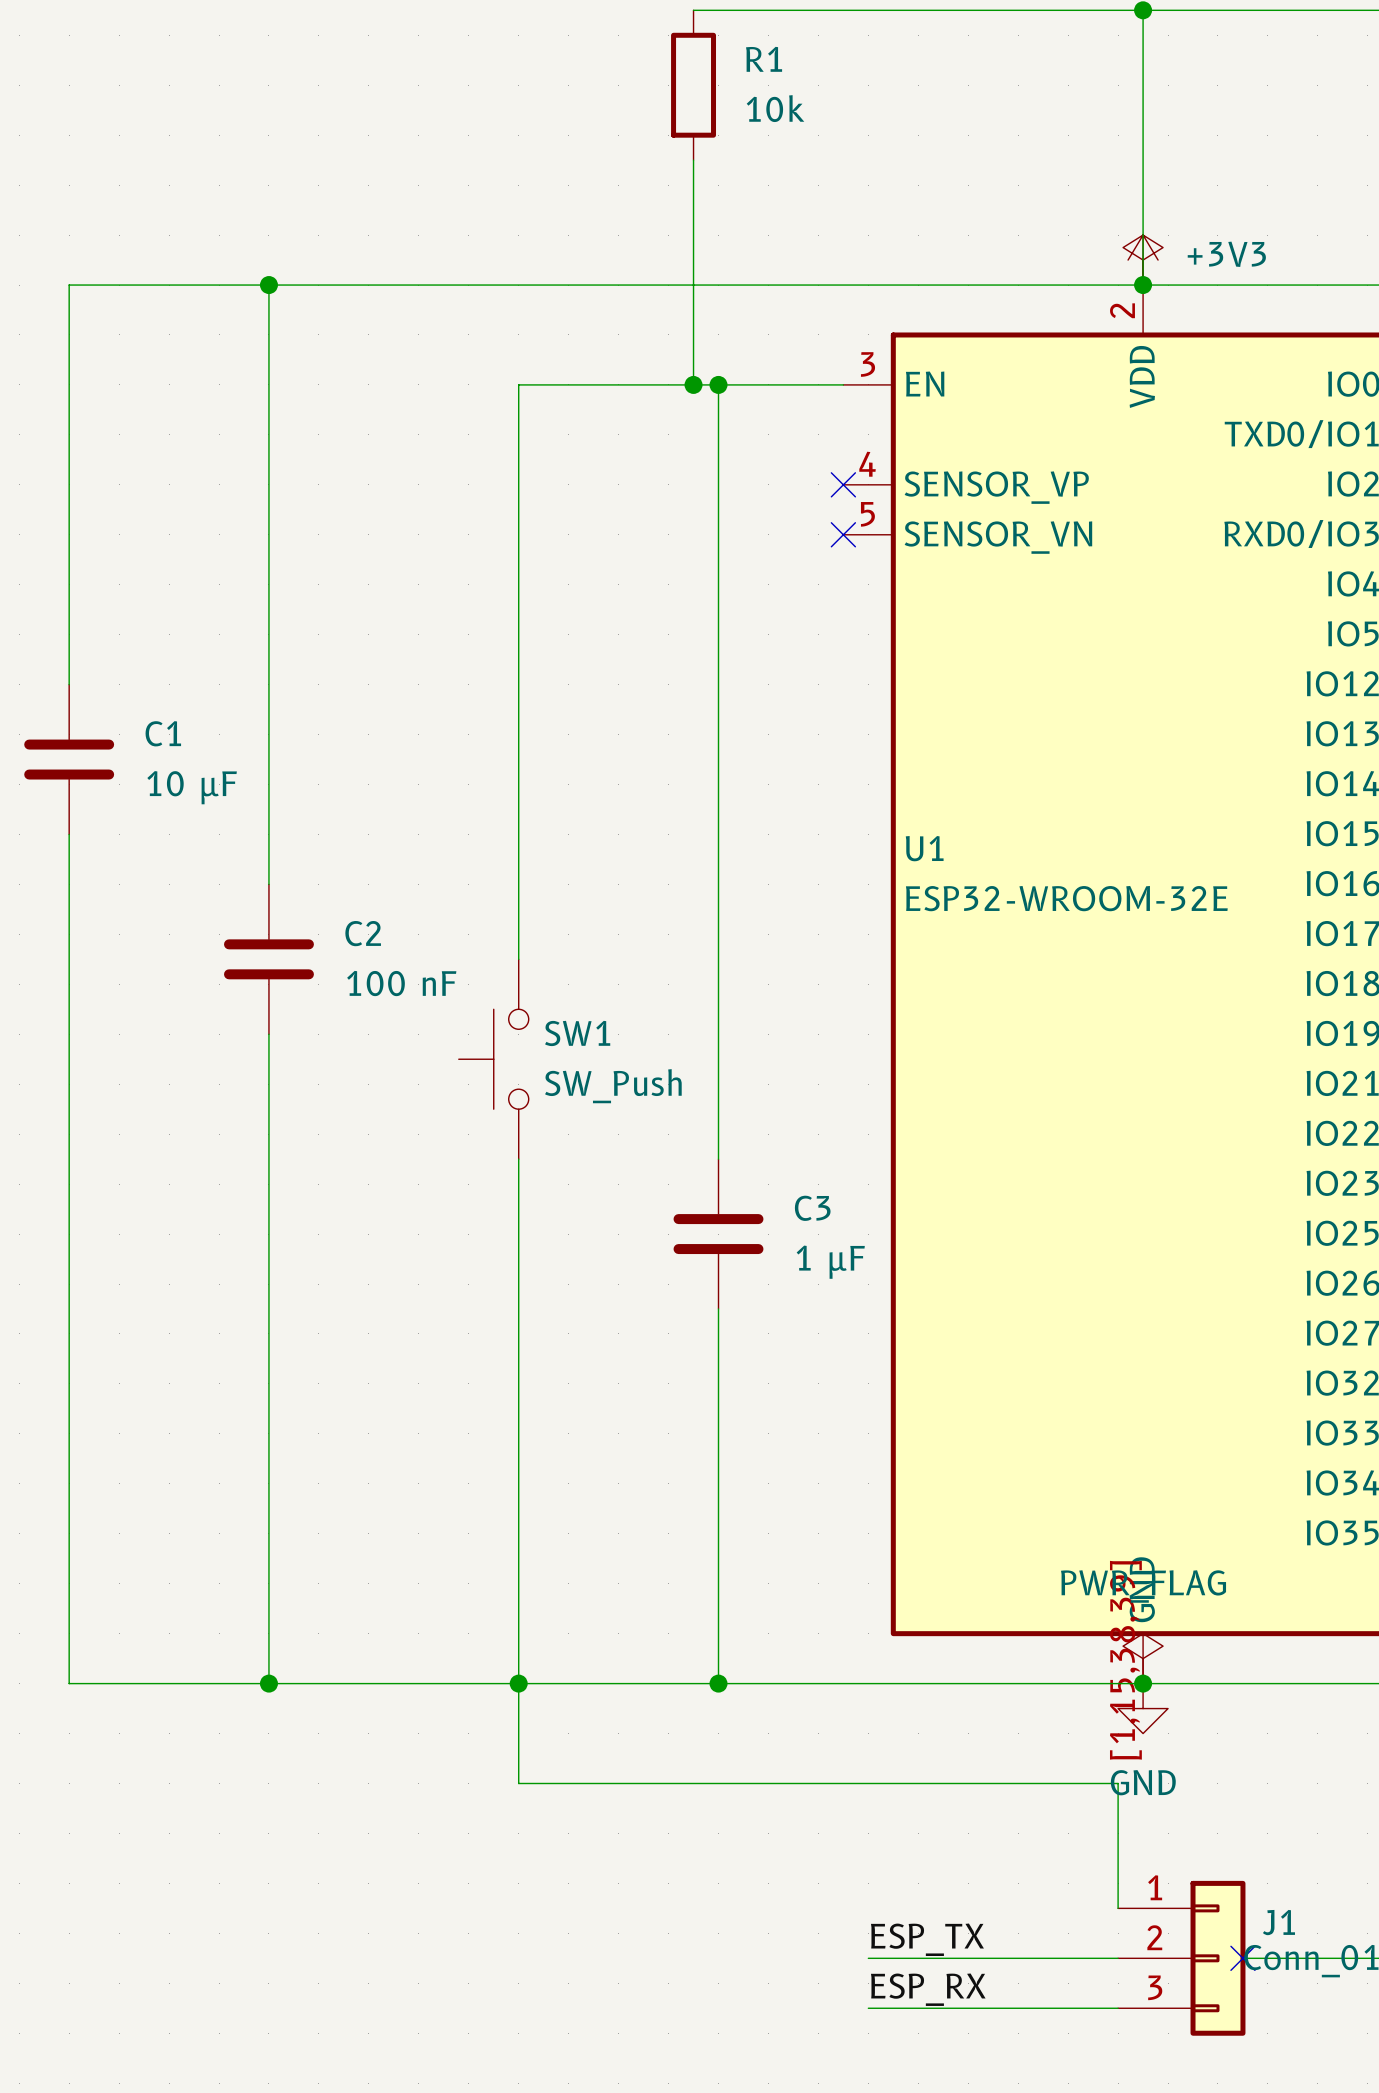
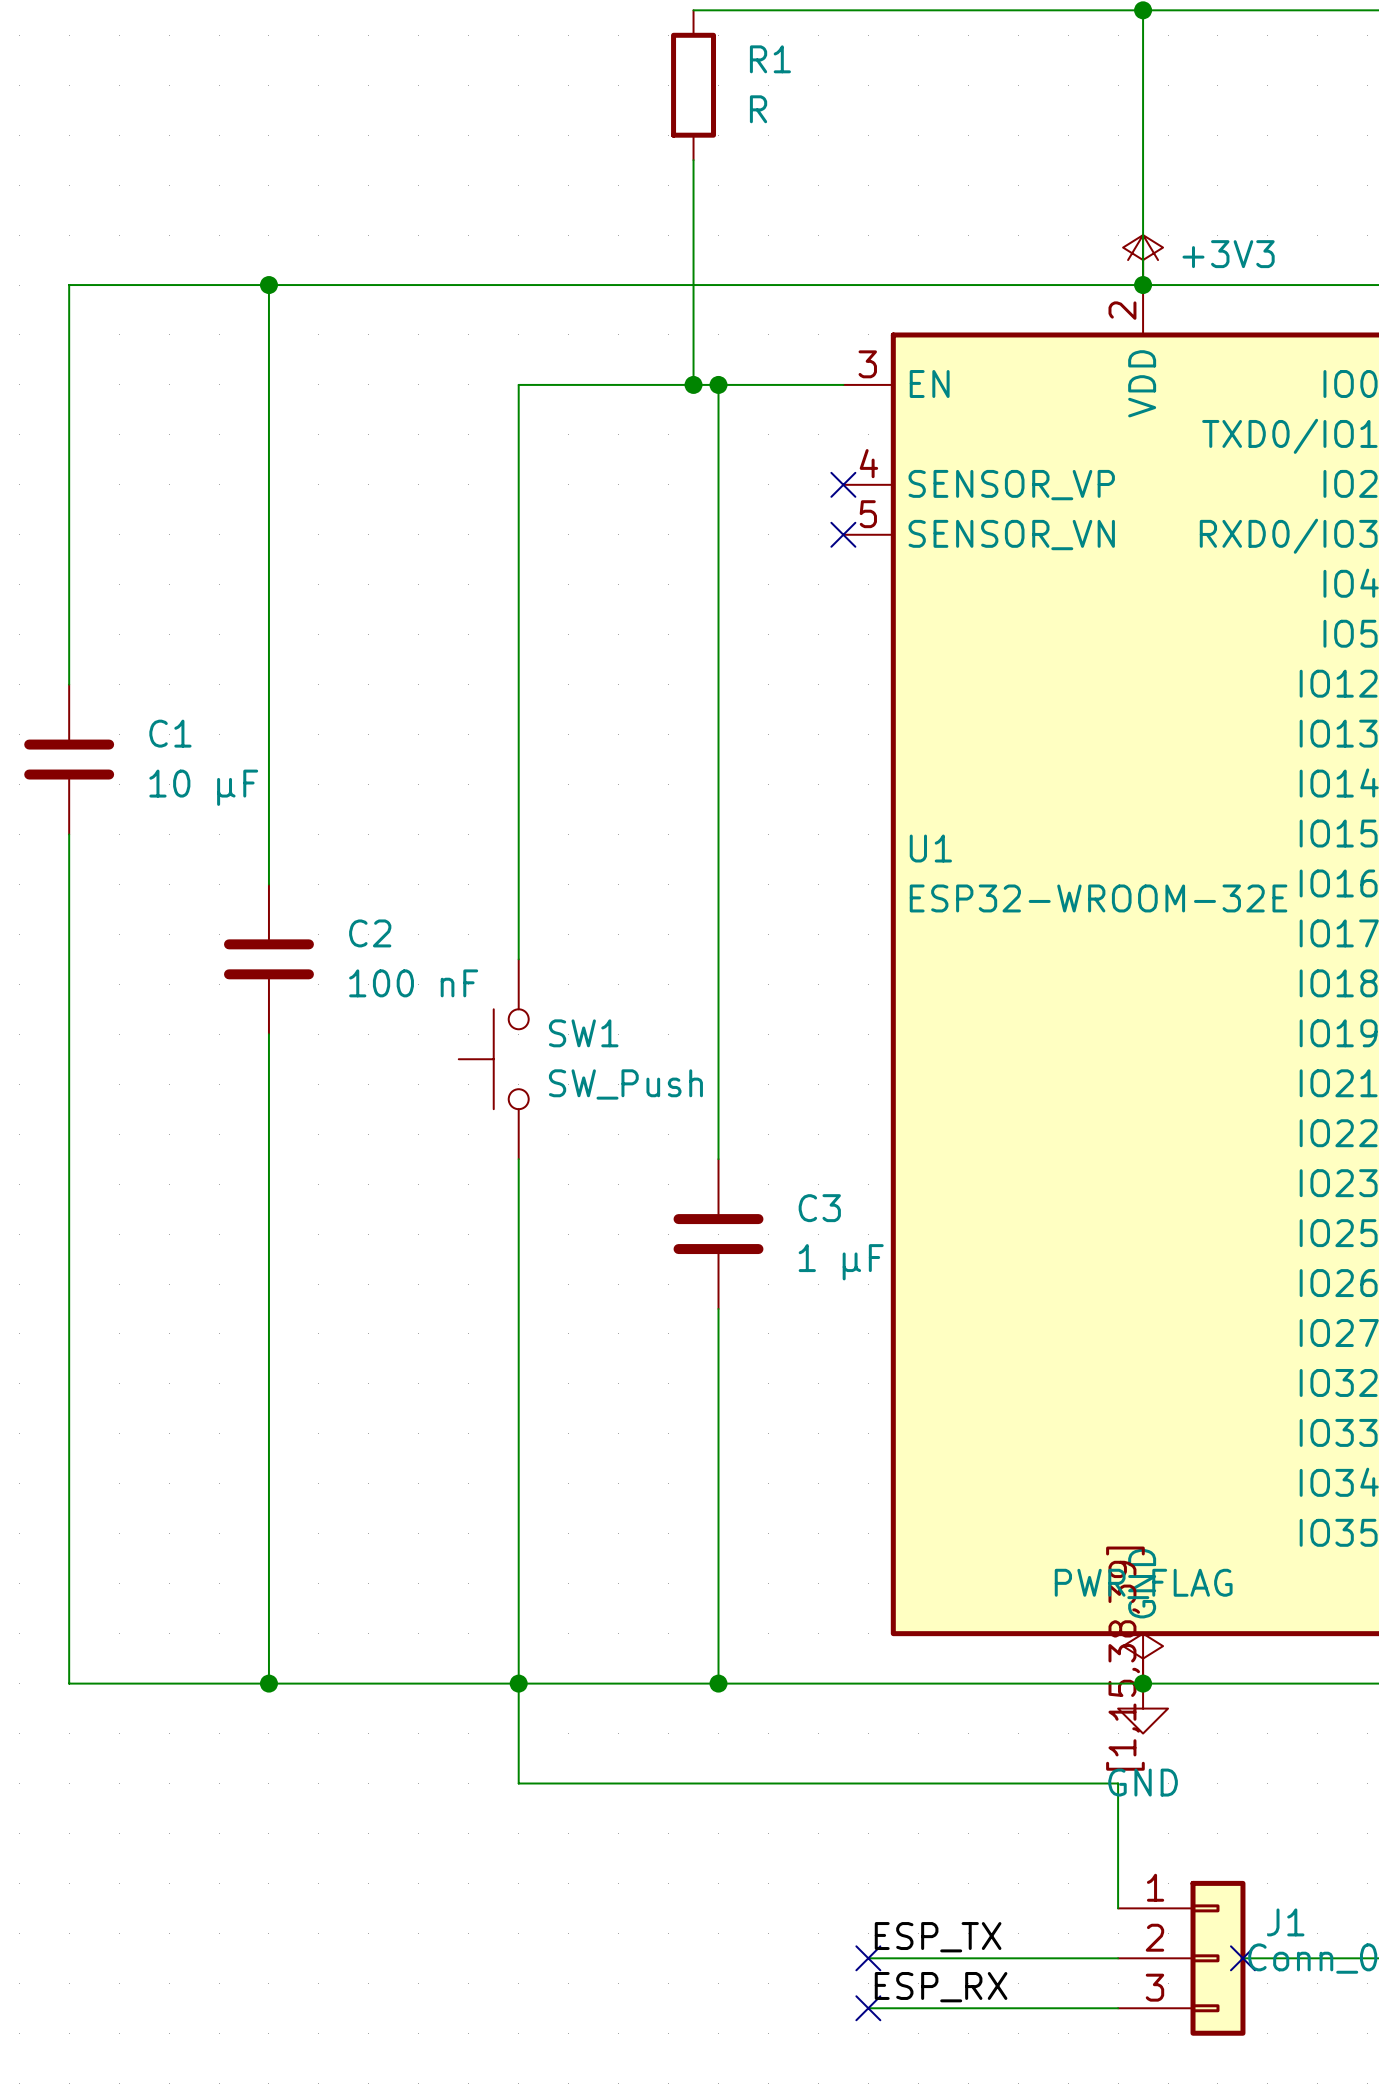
R1 value: 10k (775, 108) -> R (758, 109)
no-connect mark: none -> (868, 1958)
no-connect mark: none -> (868, 2008)

